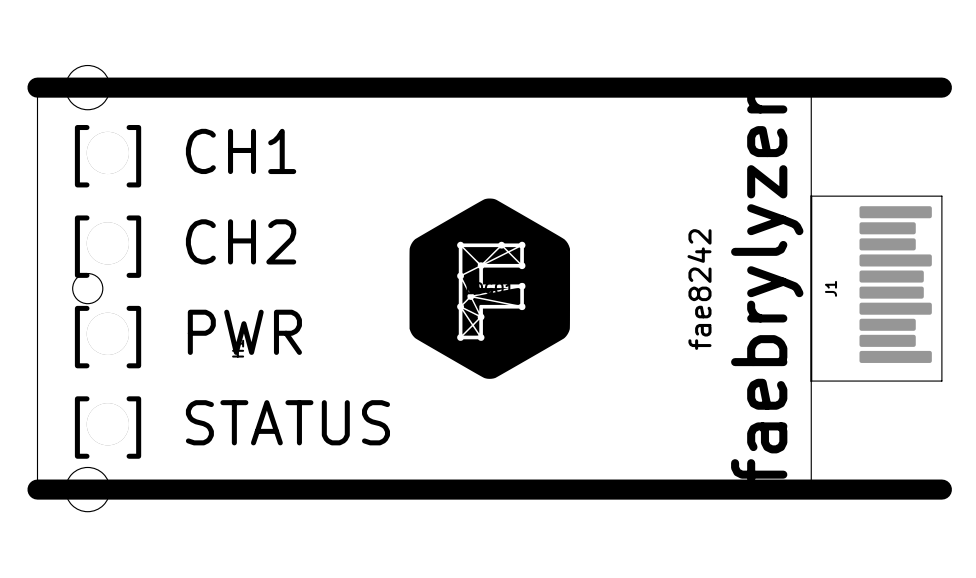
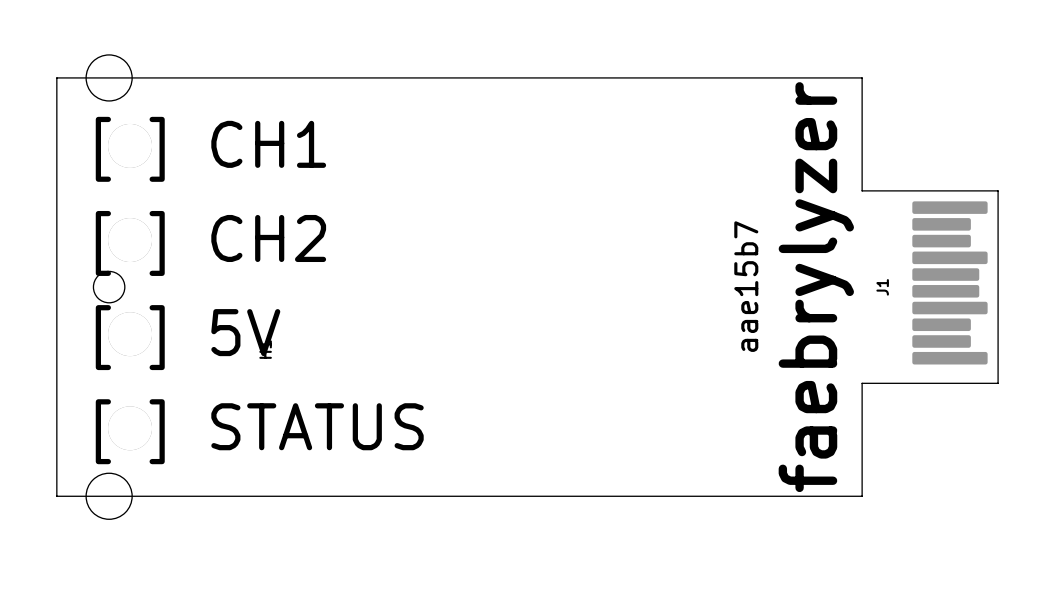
line: (37, 87) (941, 87) -> none
J1 footprint: [810, 195, 932, 383] -> [912, 201, 988, 365]
part: (489, 288) -> none
text: fae8242 (699, 289) -> aae15b7 (746, 286)
text: [ ] PWR (188, 337) -> [ ] 5V (188, 337)
line: (37, 489) (941, 489) -> none

